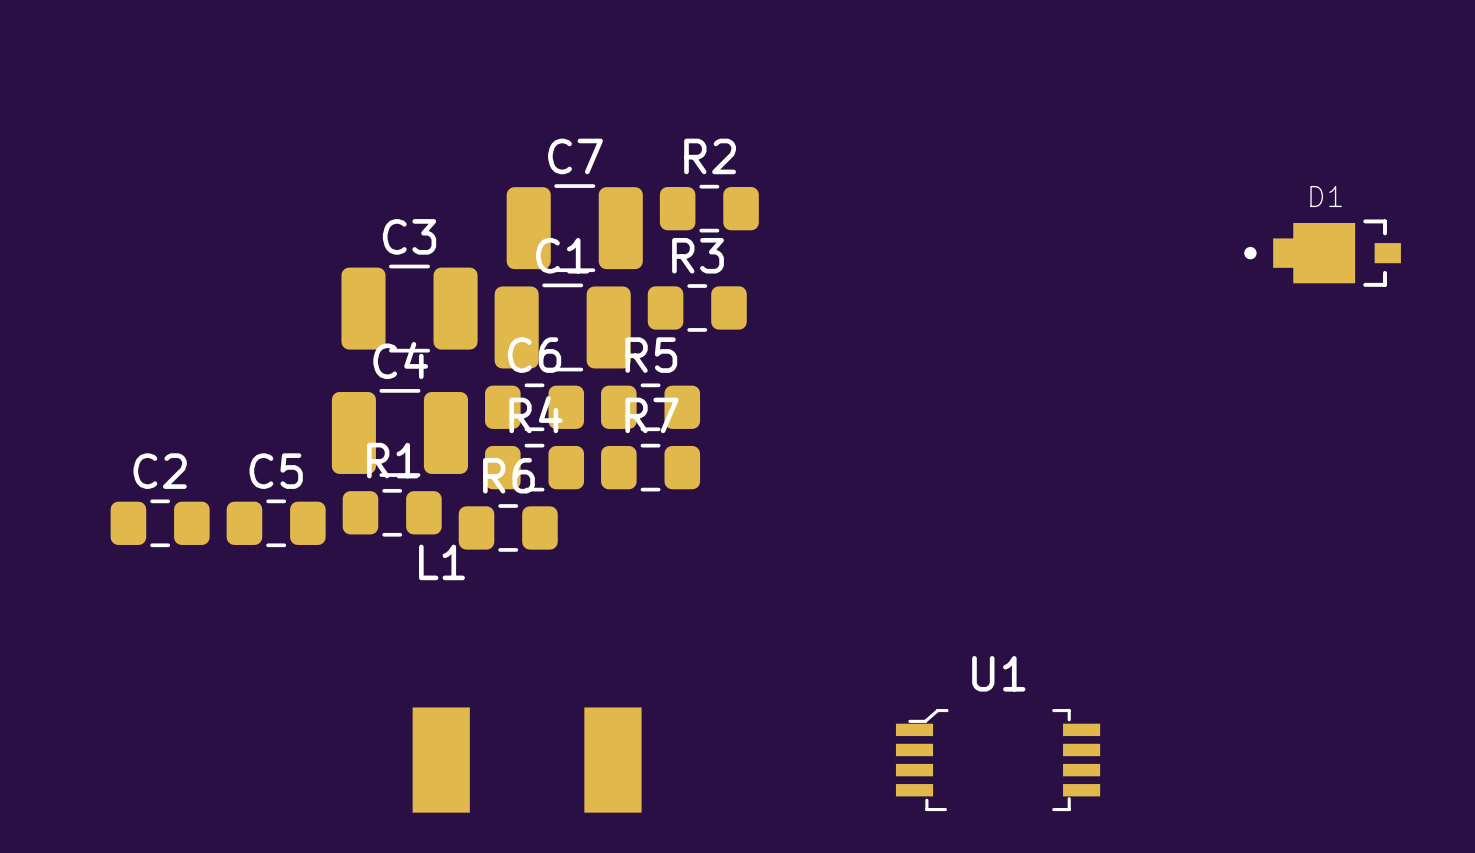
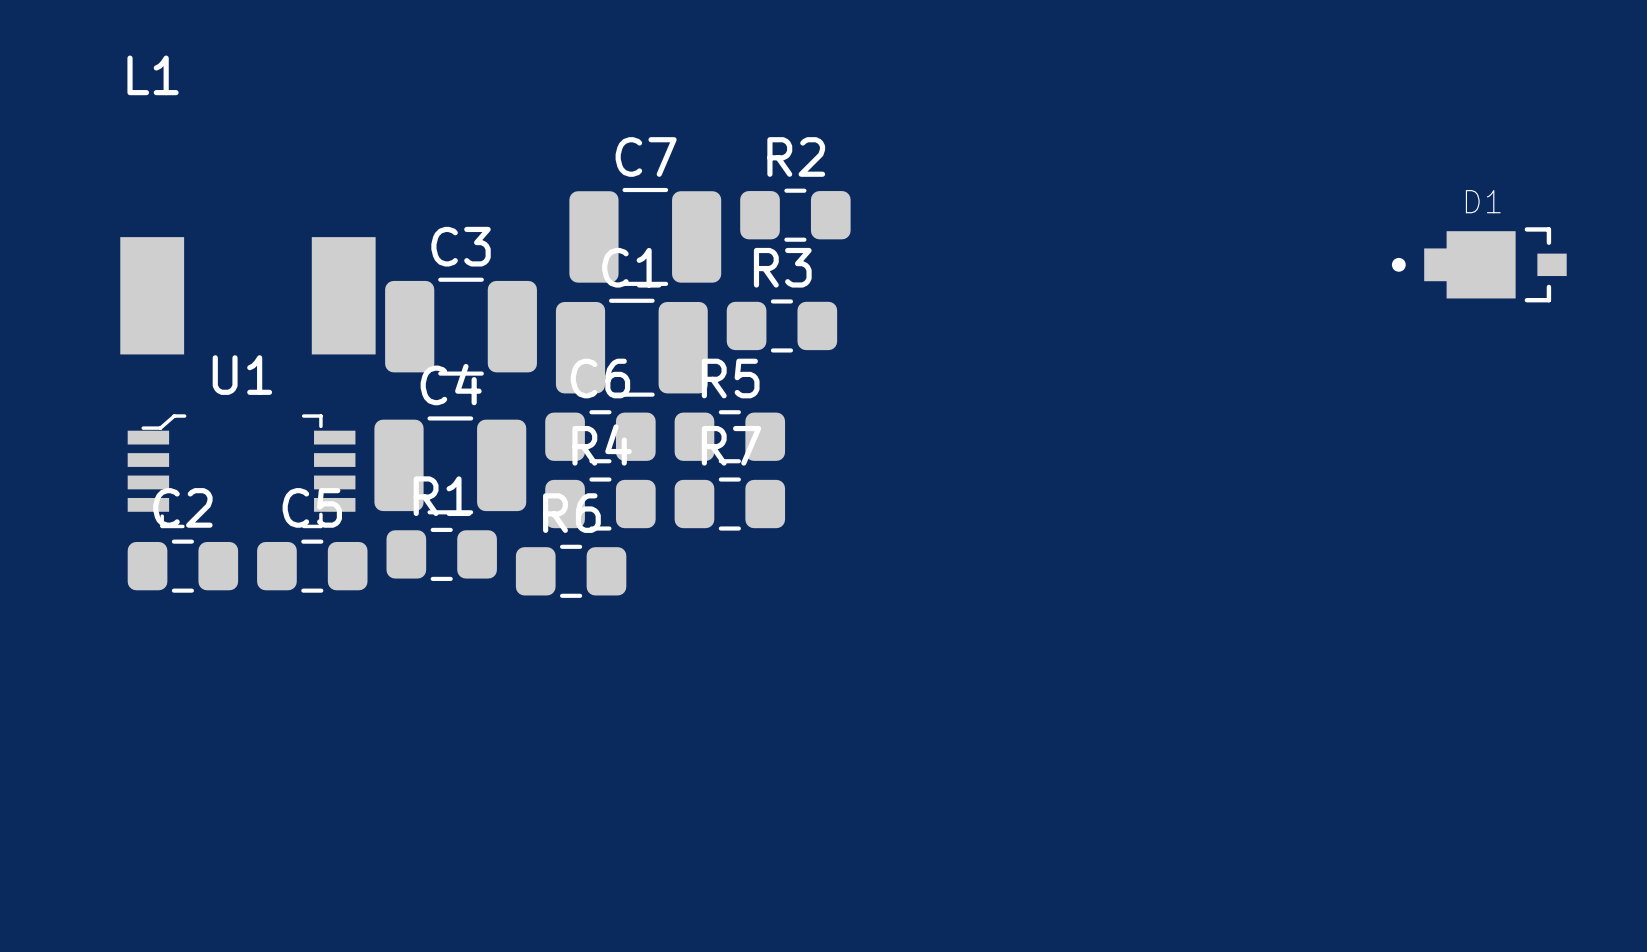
L1 position: (527, 760) -> (247, 295)
U1 position: (998, 760) -> (241, 471)

